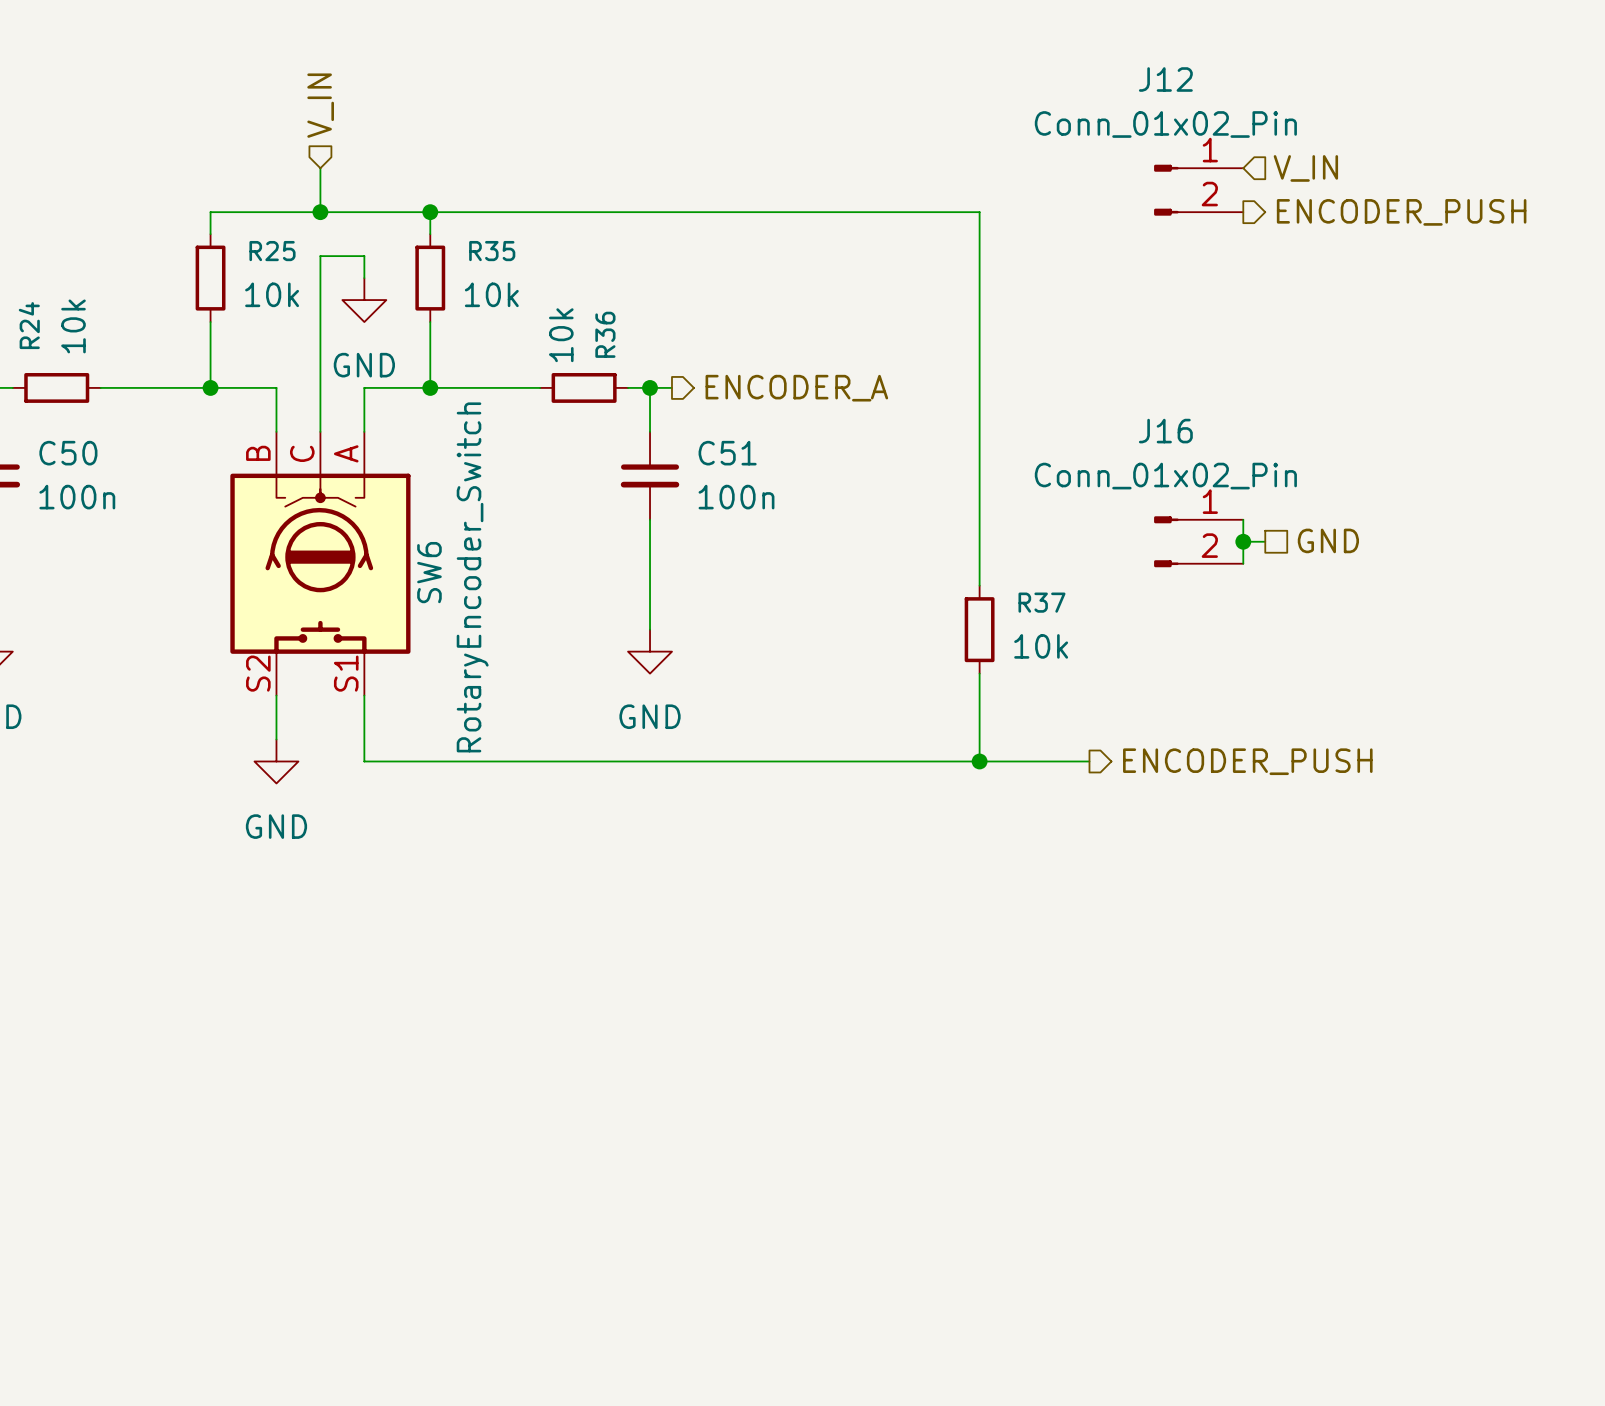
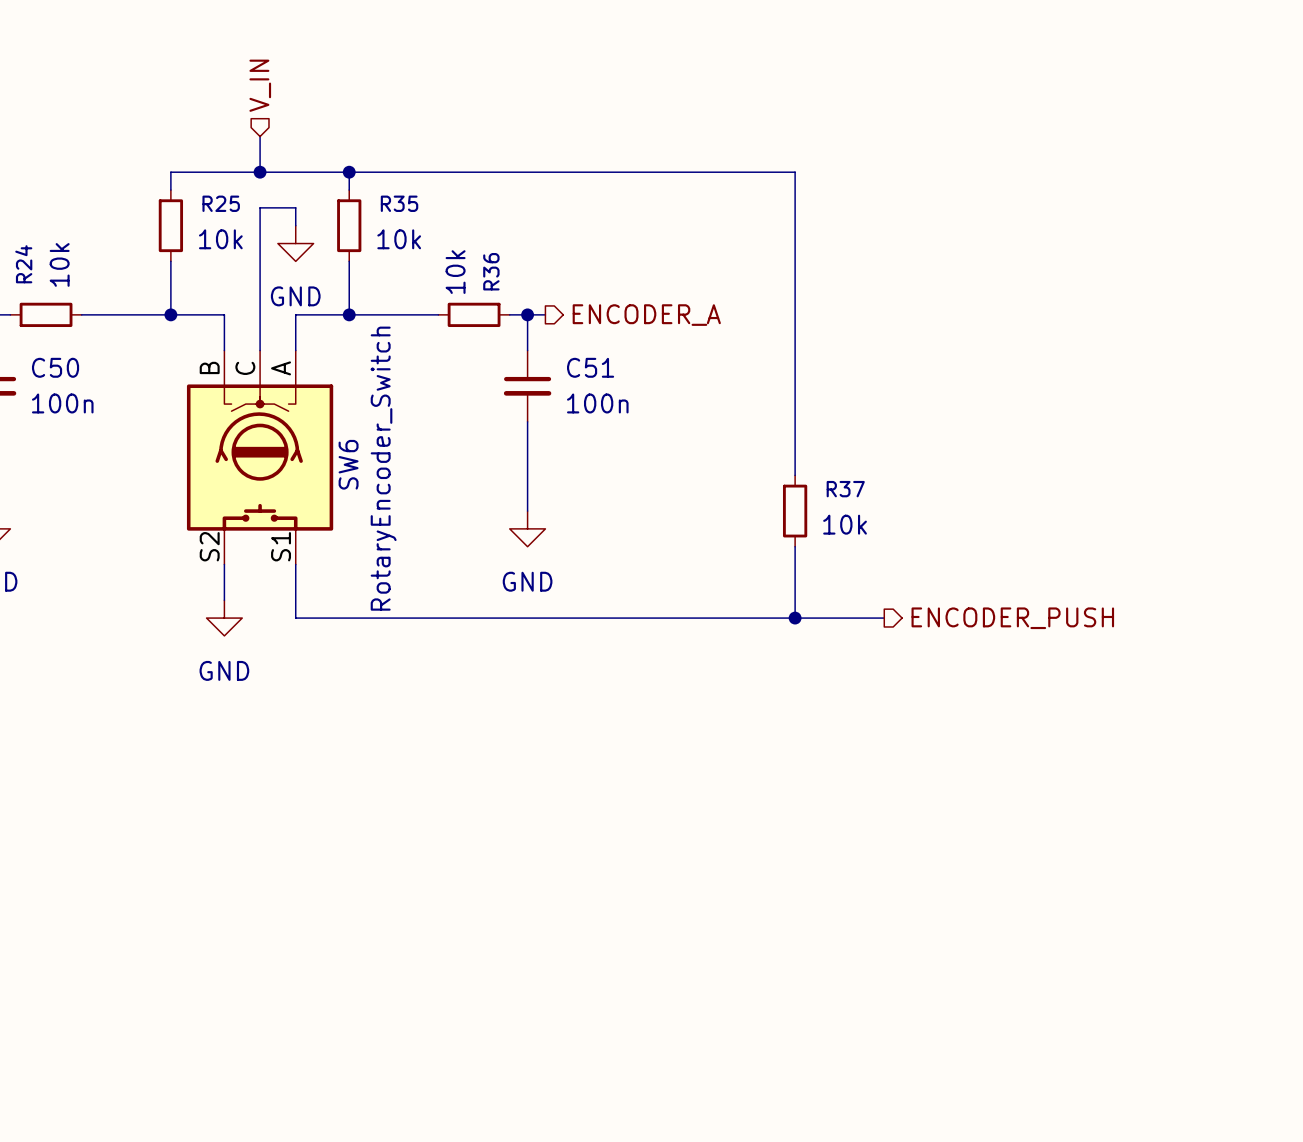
hierarchical label: V_IN (1305, 168) -> none
J12: Conn_01x02_Pin (1198, 190) -> none
hierarchical label: ENCODER_PUSH (1401, 212) -> none
wire: (1243, 519) (1243, 563) -> none
hierarchical label: GND (1328, 540) -> none
J16: Conn_01x02_Pin (1198, 541) -> none
wire: (1243, 541) (1265, 541) -> none
junction: (1243, 541) -> none

